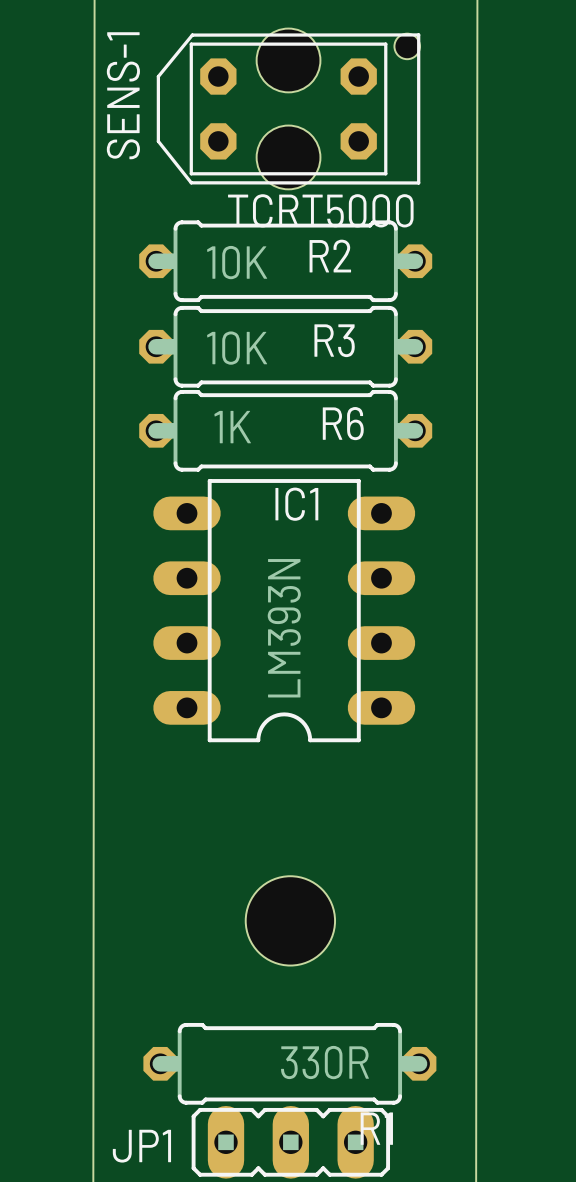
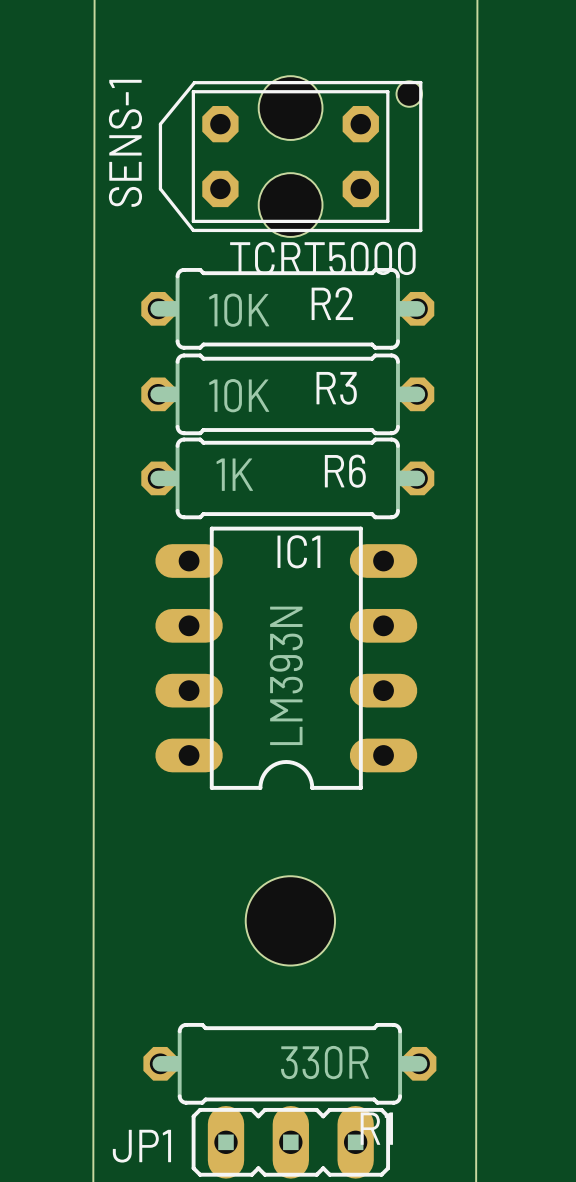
SENS-1 position: (288, 108) -> (290, 156)
R2 position: (285, 261) -> (287, 308)
R3 position: (285, 346) -> (287, 394)
R6 position: (285, 430) -> (287, 478)
IC1 position: (284, 610) -> (286, 658)

